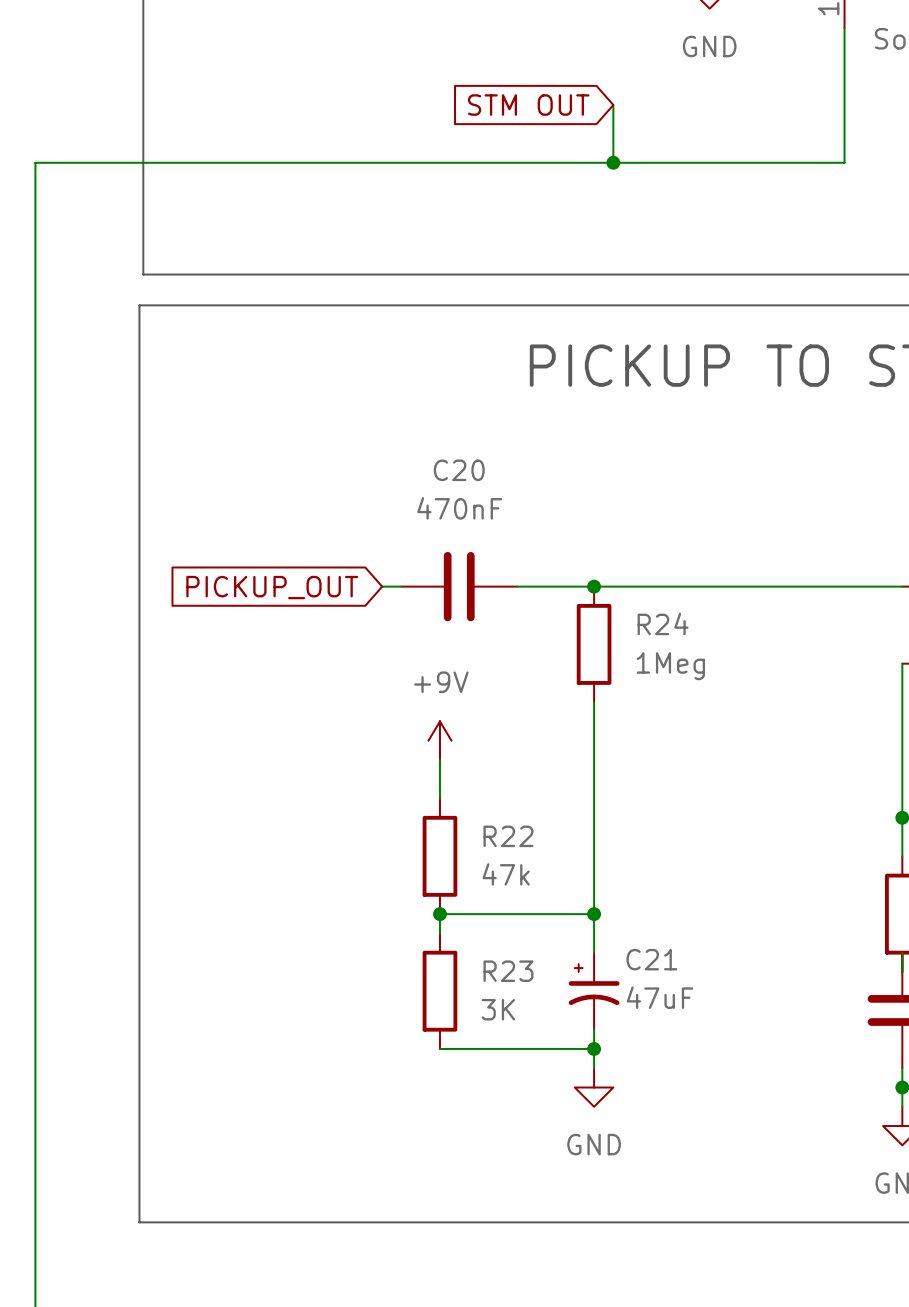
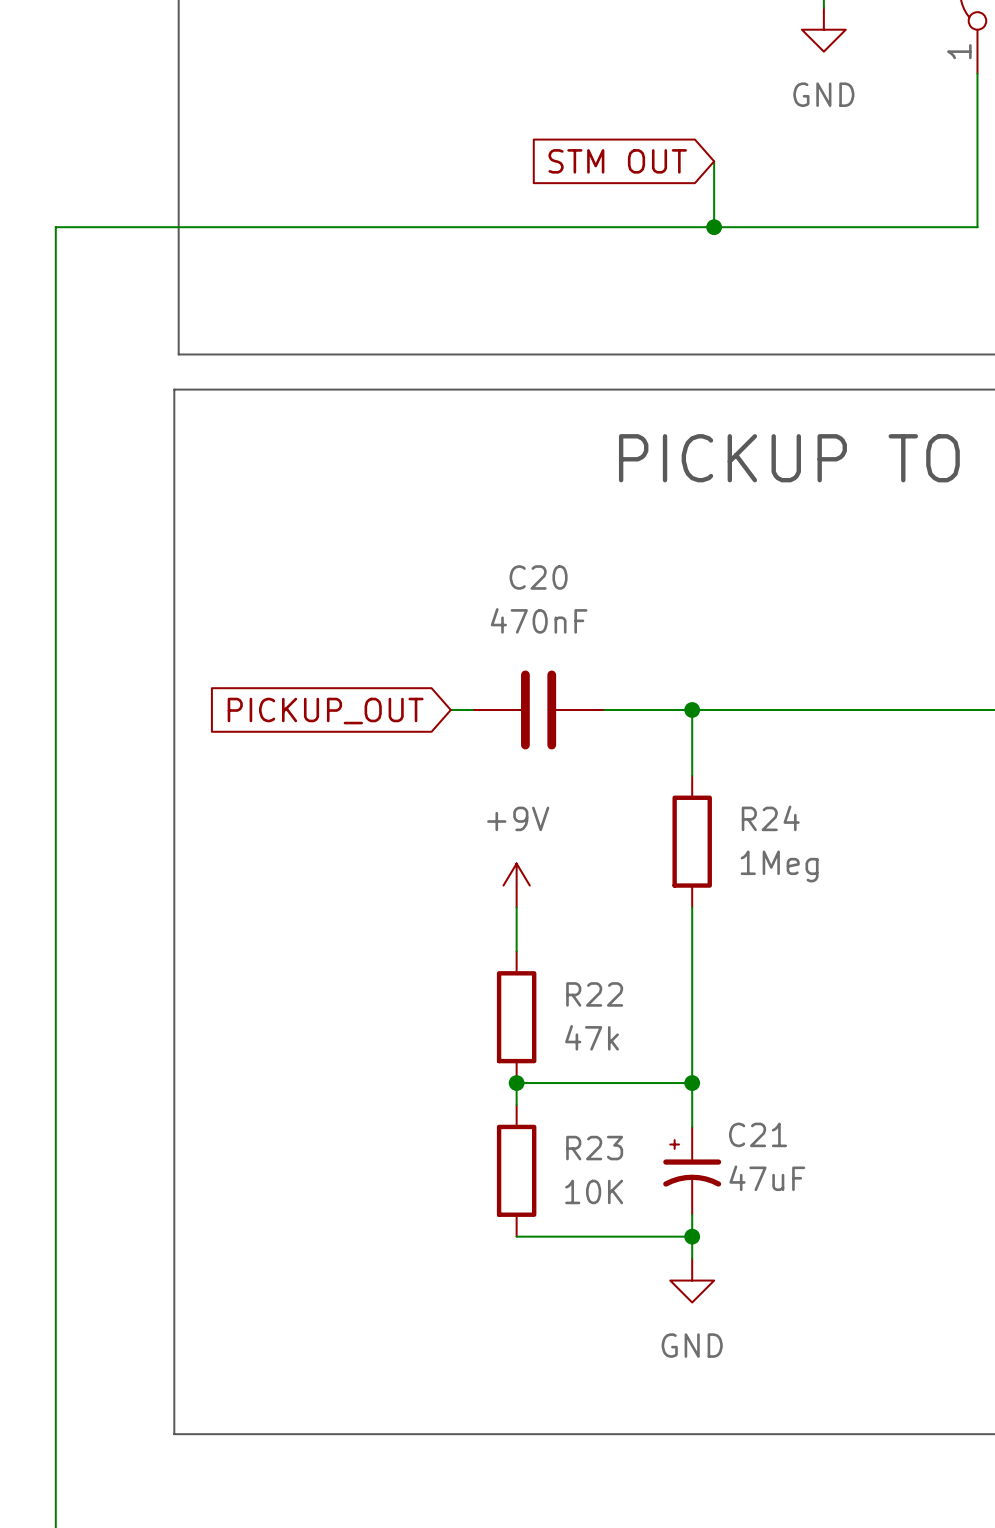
R24 position: (594, 644) -> (692, 841)
wire: (594, 702) (594, 760) -> (692, 709) (692, 775)
R23 value: 3K (498, 1009) -> 10K (594, 1191)

